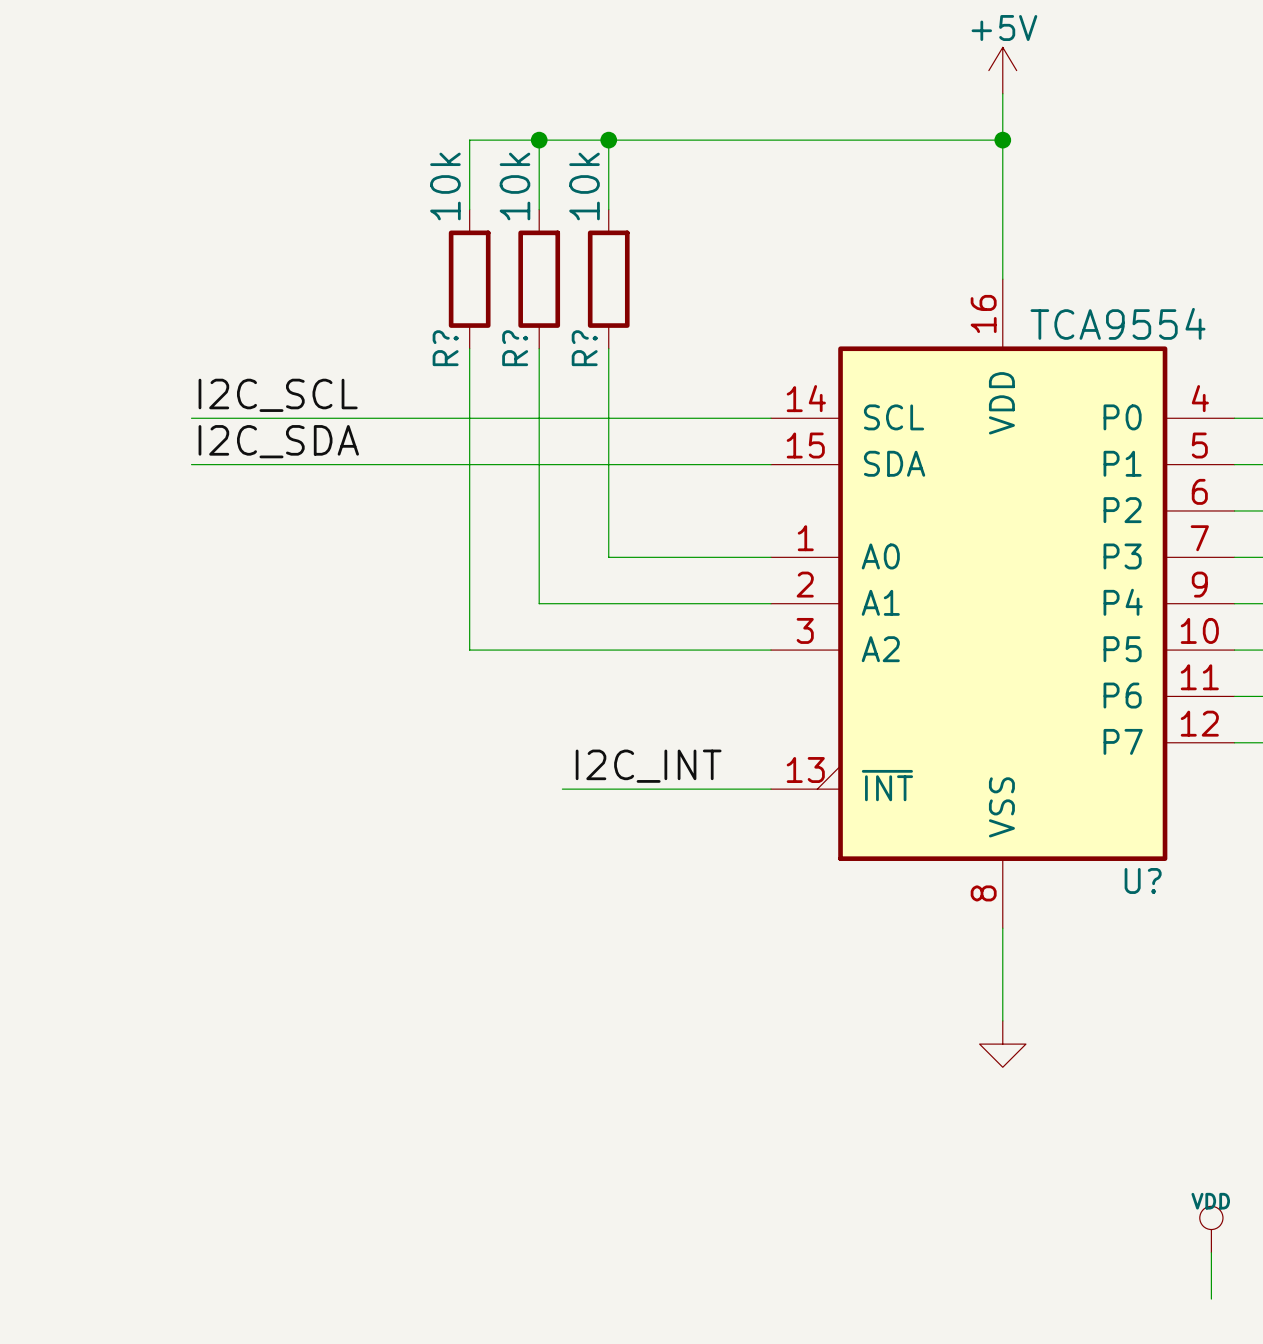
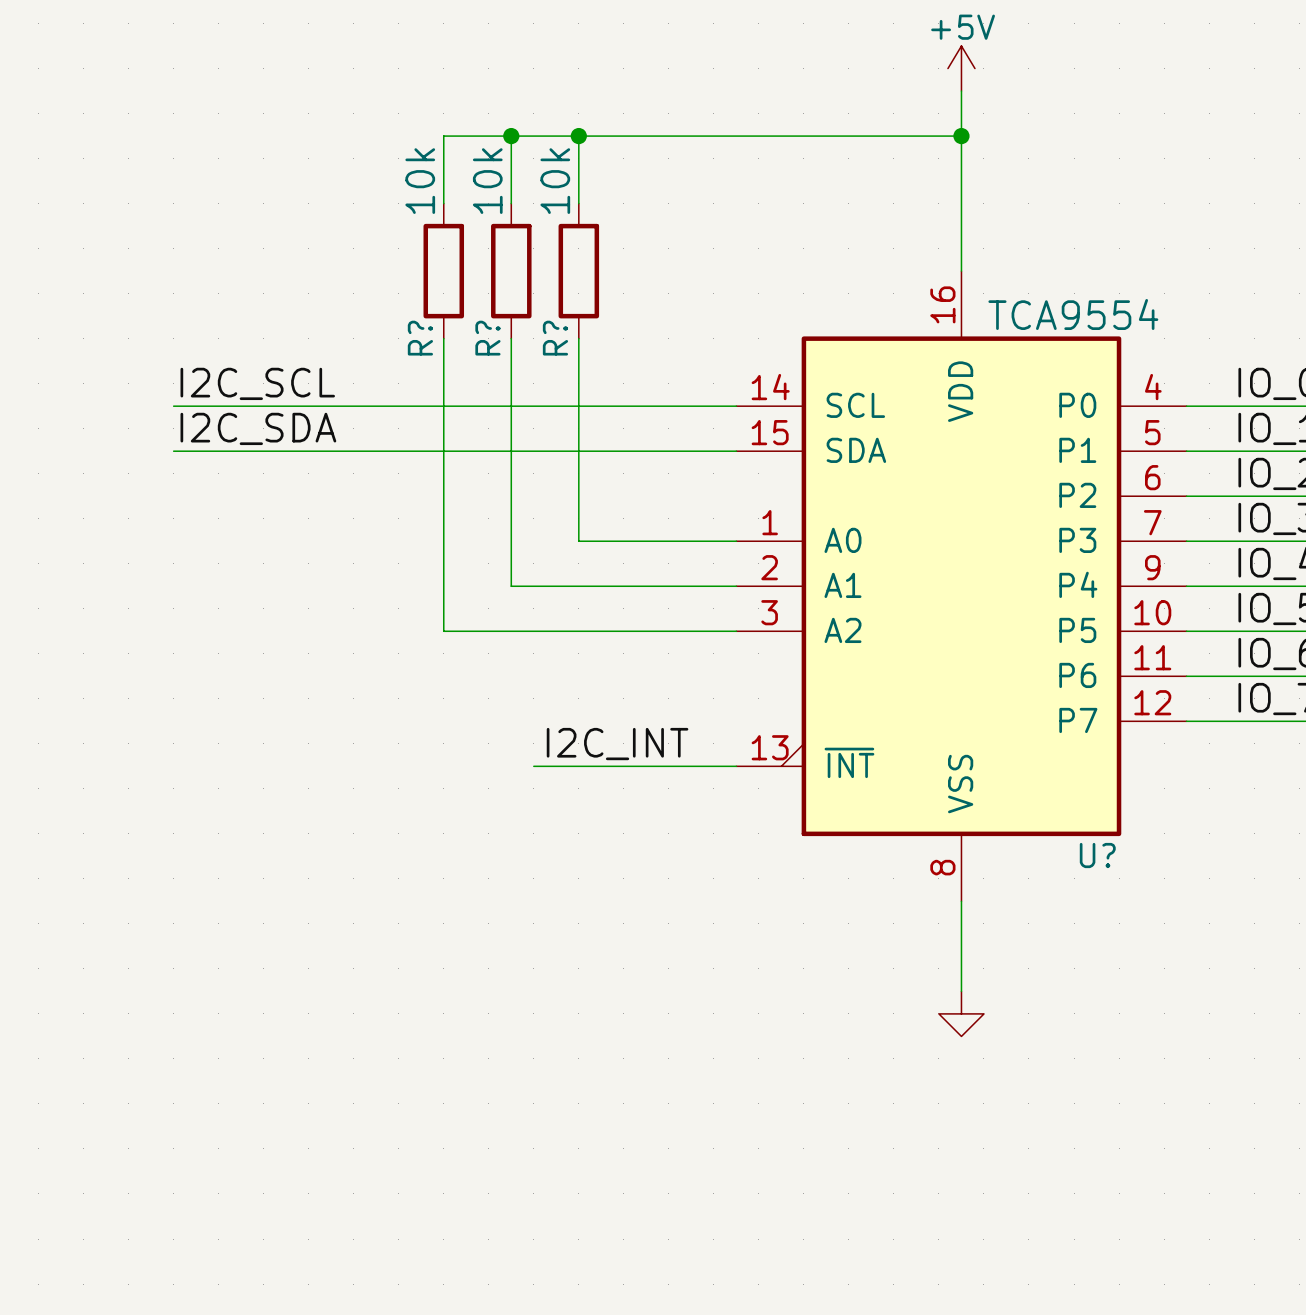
power symbol: VDD (1211, 1229) -> none
wire: (1211, 1252) (1211, 1299) -> none

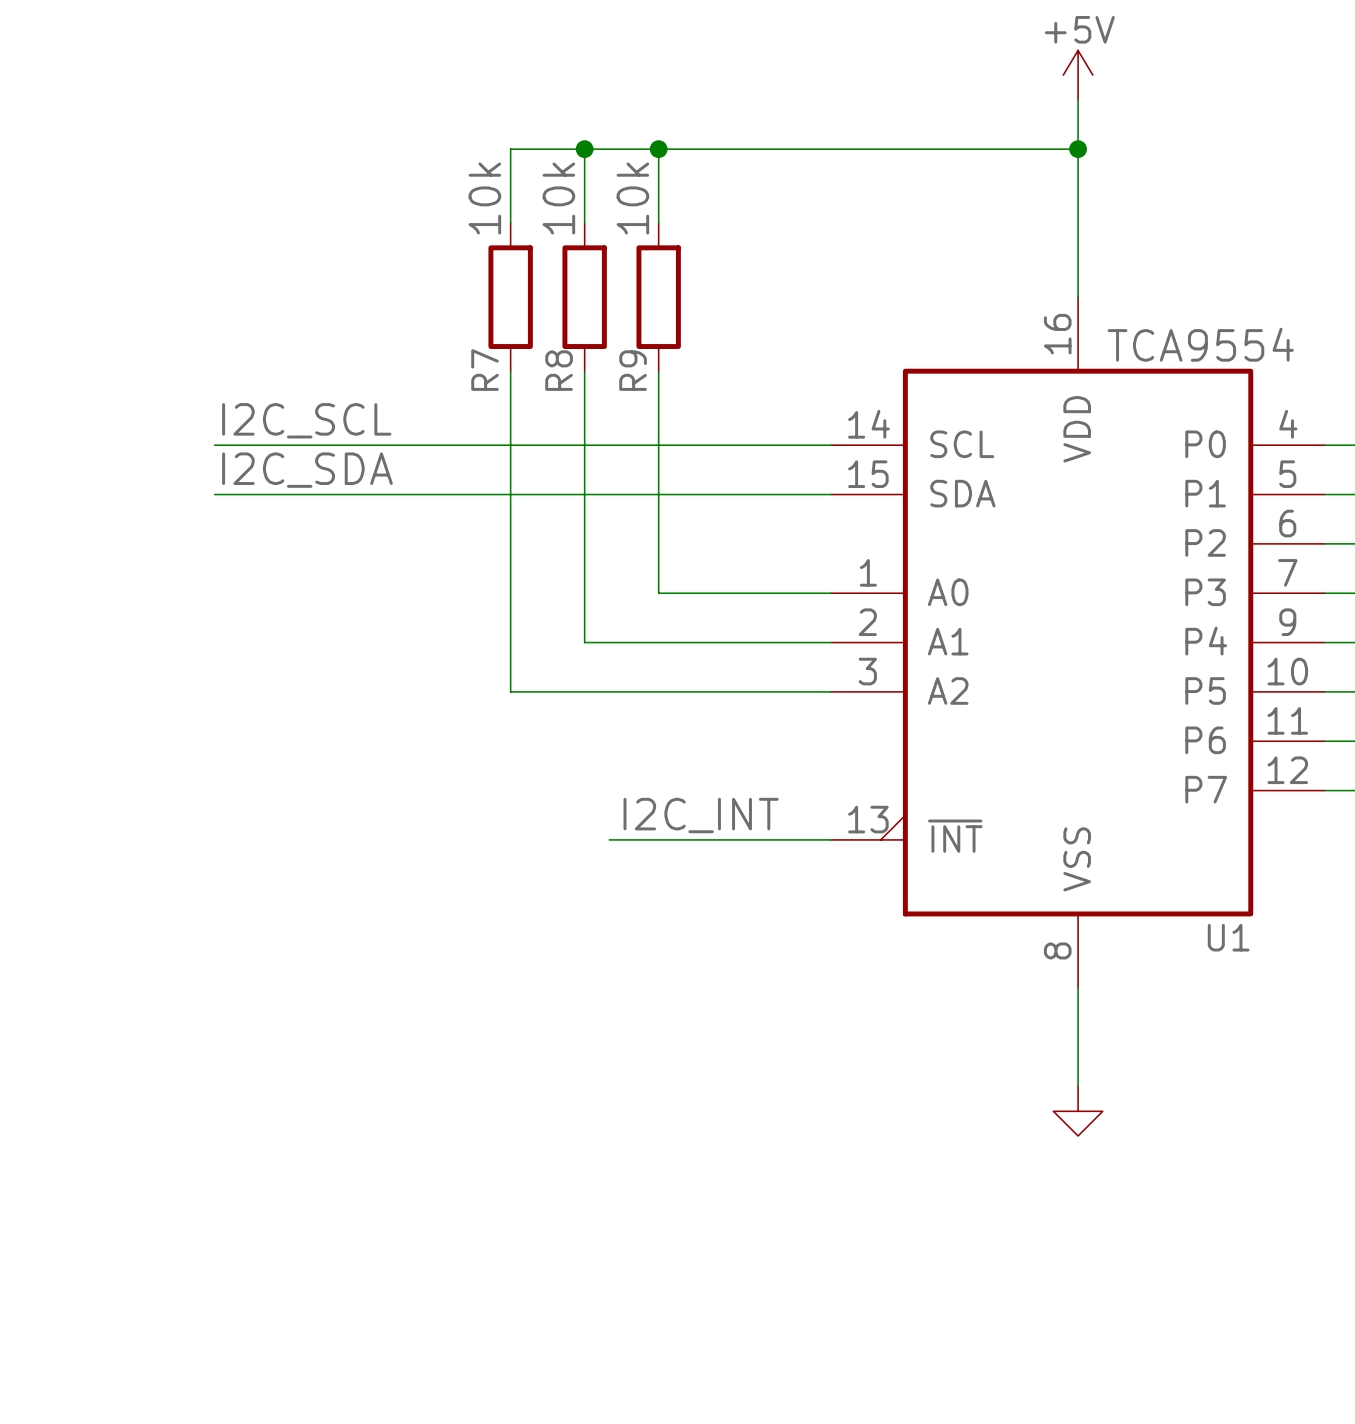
R? name: R? (420, 338) -> R7 (485, 370)
R? name: R? (487, 338) -> R8 (559, 370)
R? name: R? (555, 338) -> R9 (633, 370)
U? name: U? (1097, 855) -> U1 (1228, 937)

